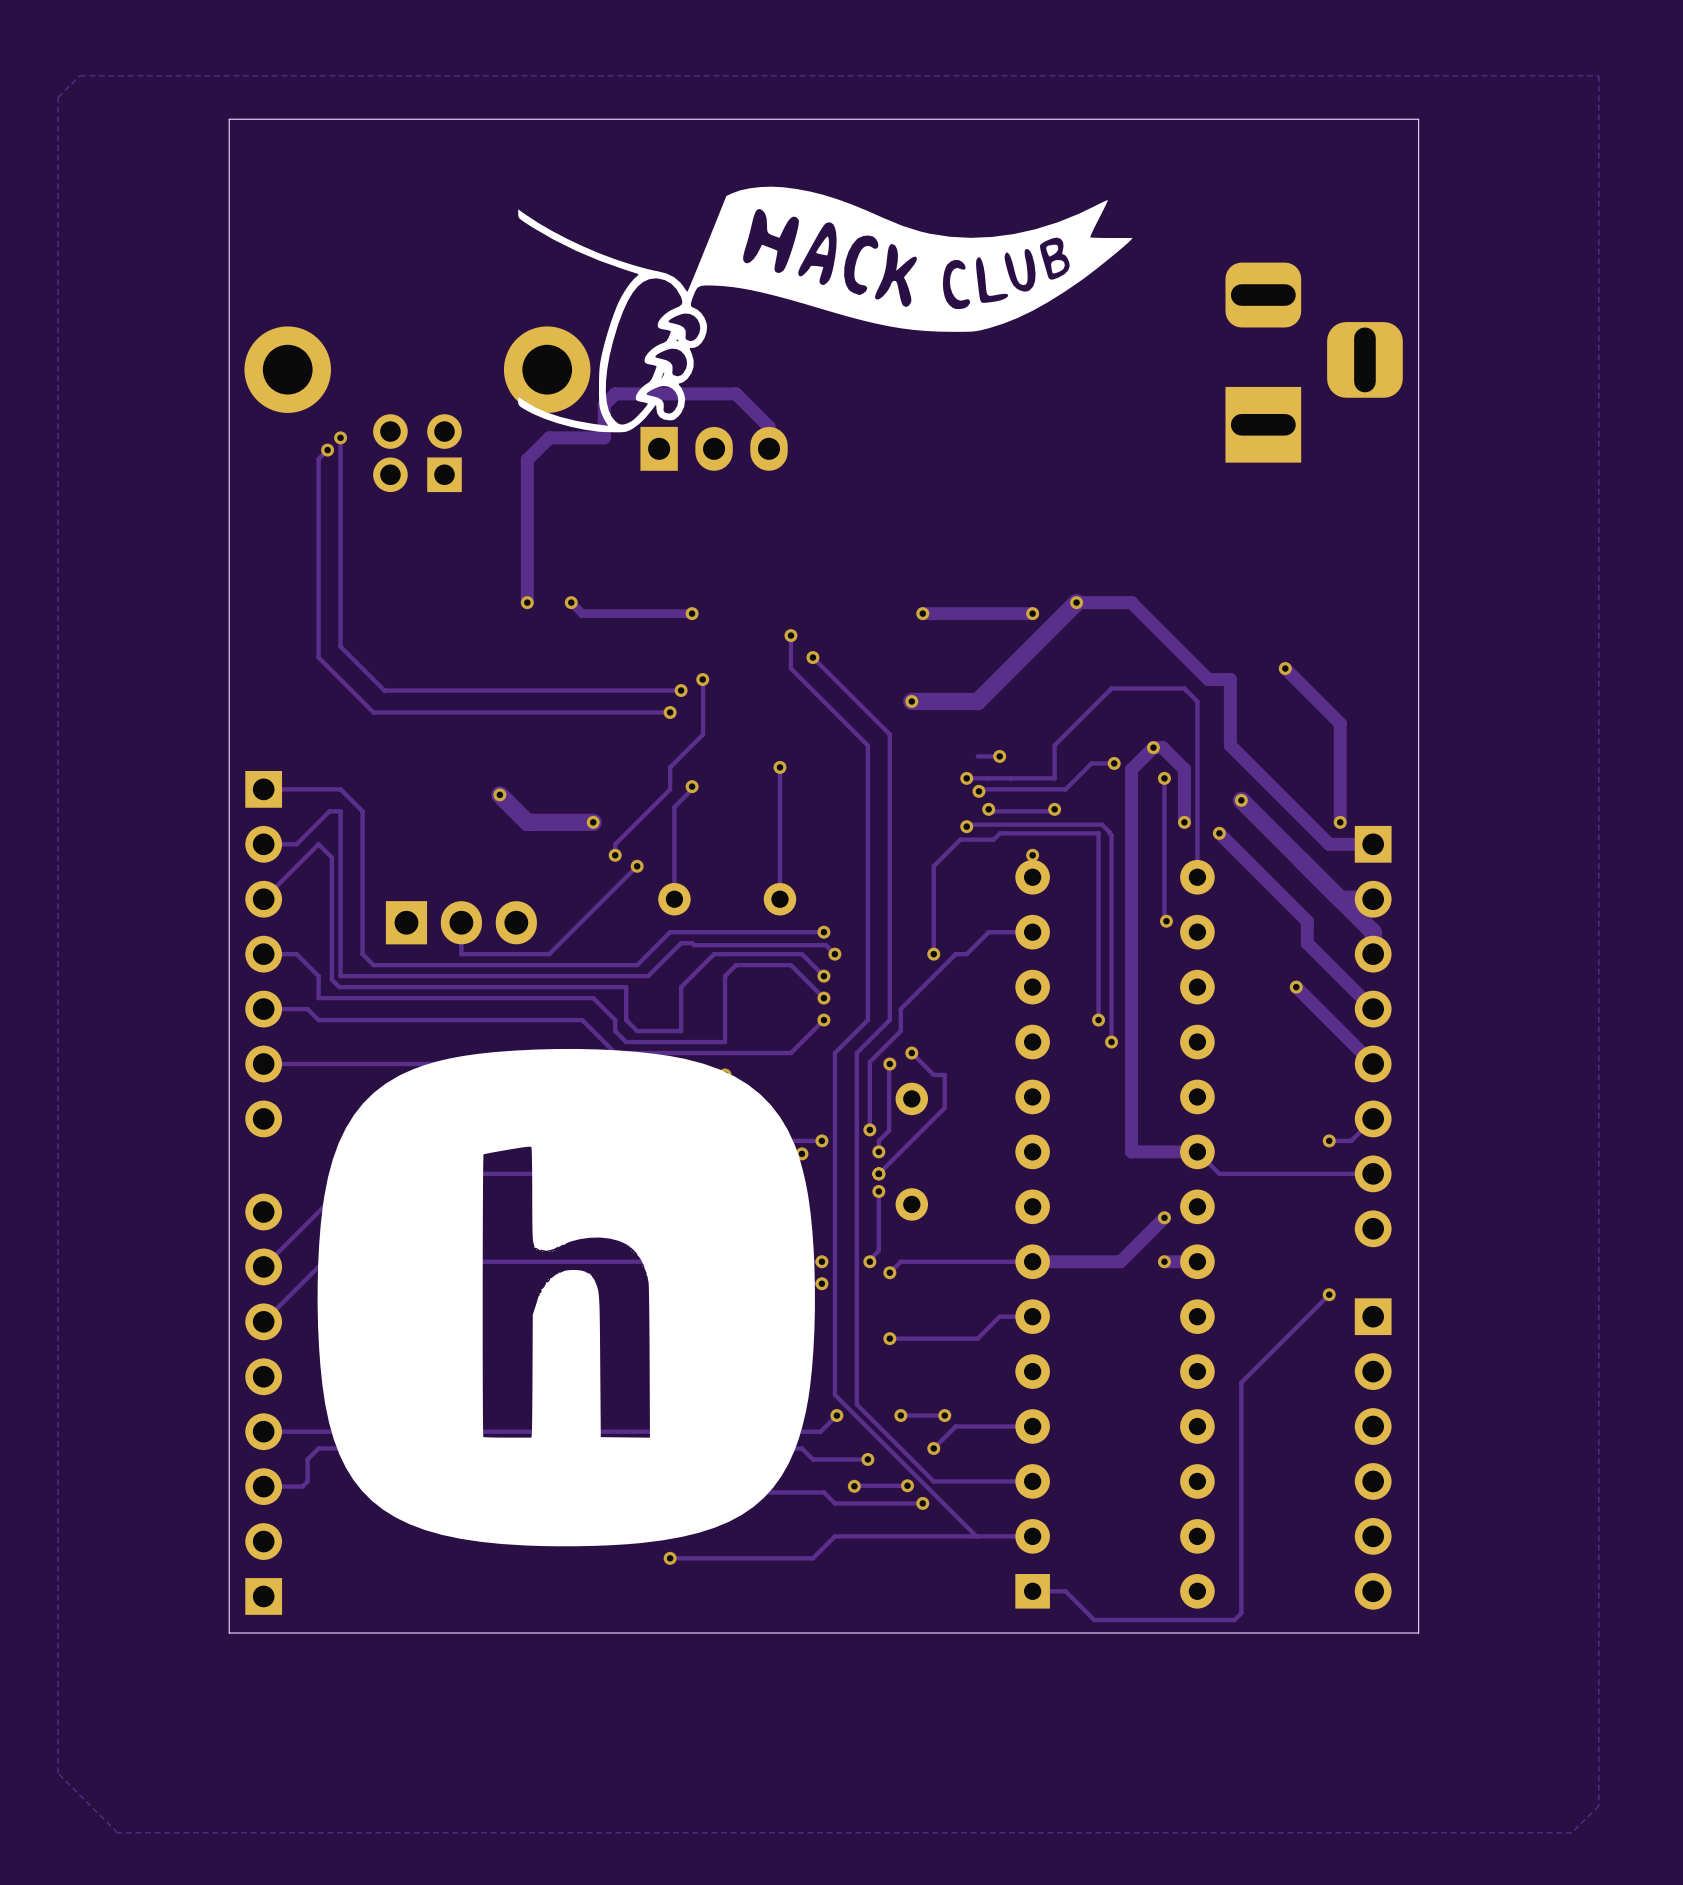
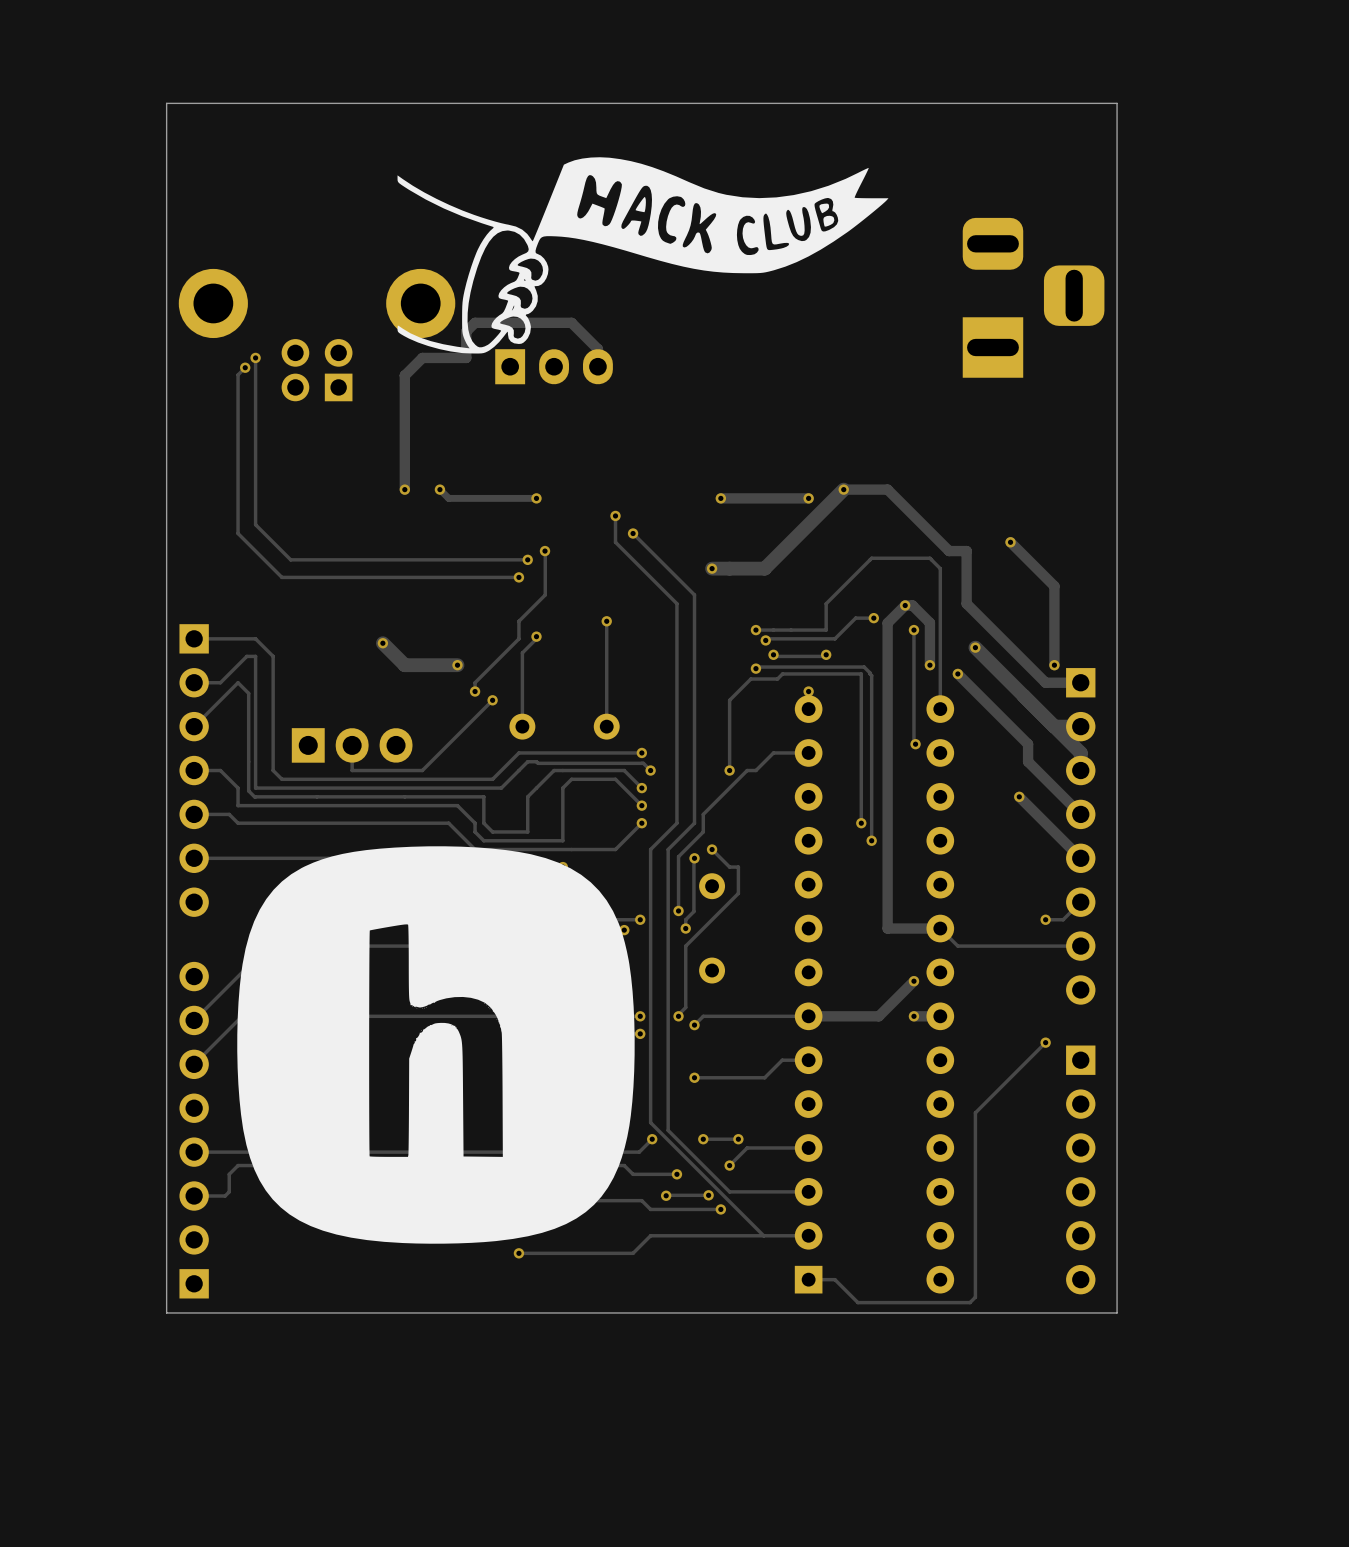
zone outline: (1598, 75) (79, 75) (58, 97) (58, 1773) (117, 1832) (1571, 1832) (1598, 1805) (1598, 75) -> none
track: (999, 756) (977, 756) -> none
via: (999, 756) -> none
track: none -> (685, 946) (685, 960)
via: (878, 1173) -> none
via: (878, 1191) -> none

